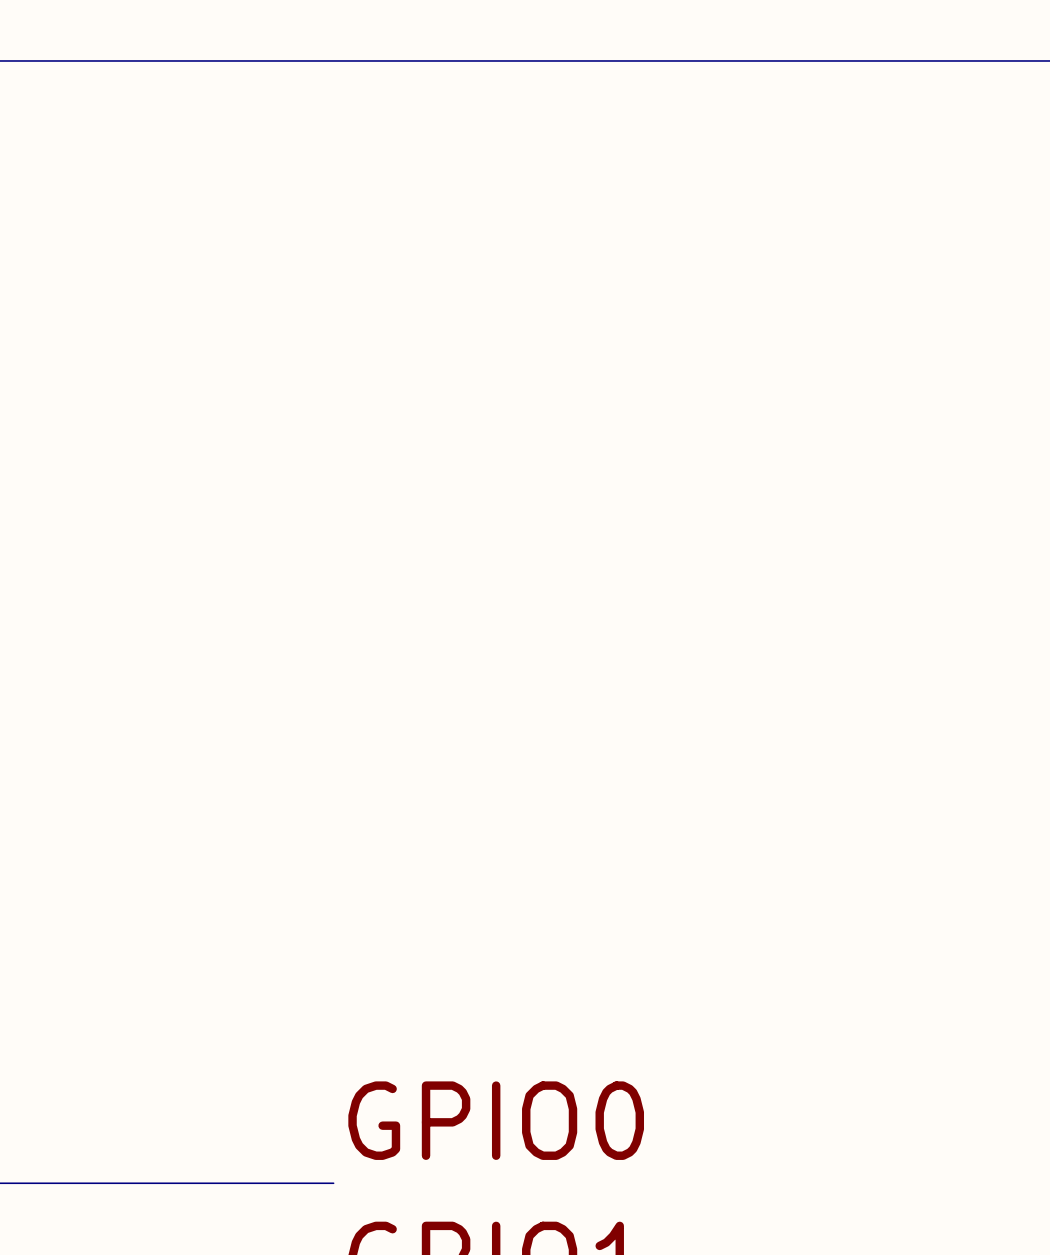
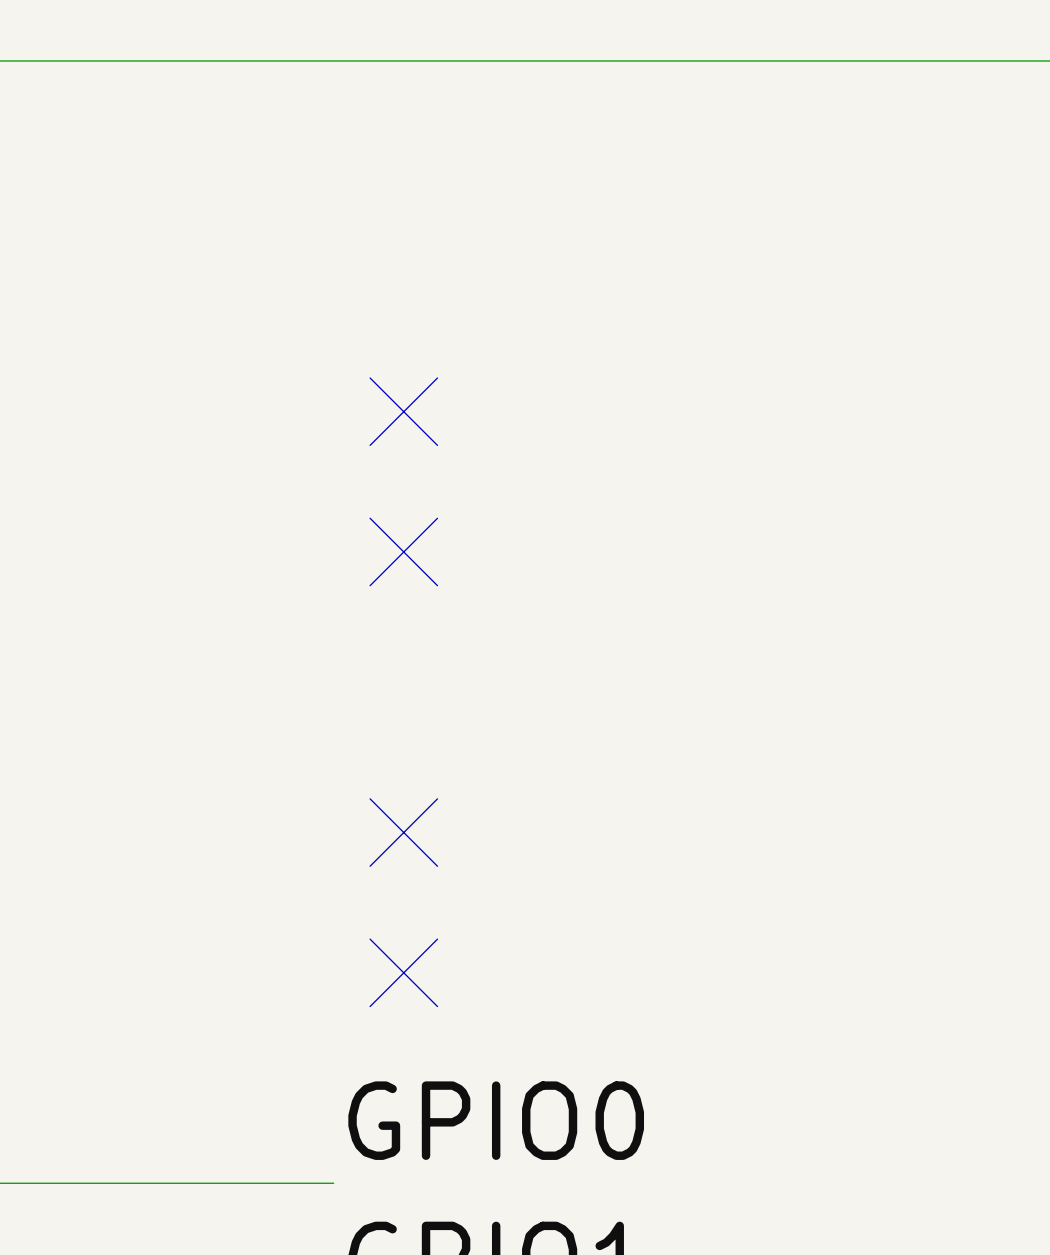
no-connect mark: none -> (403, 411)
no-connect mark: none -> (403, 551)
no-connect mark: none -> (403, 832)
no-connect mark: none -> (403, 972)

